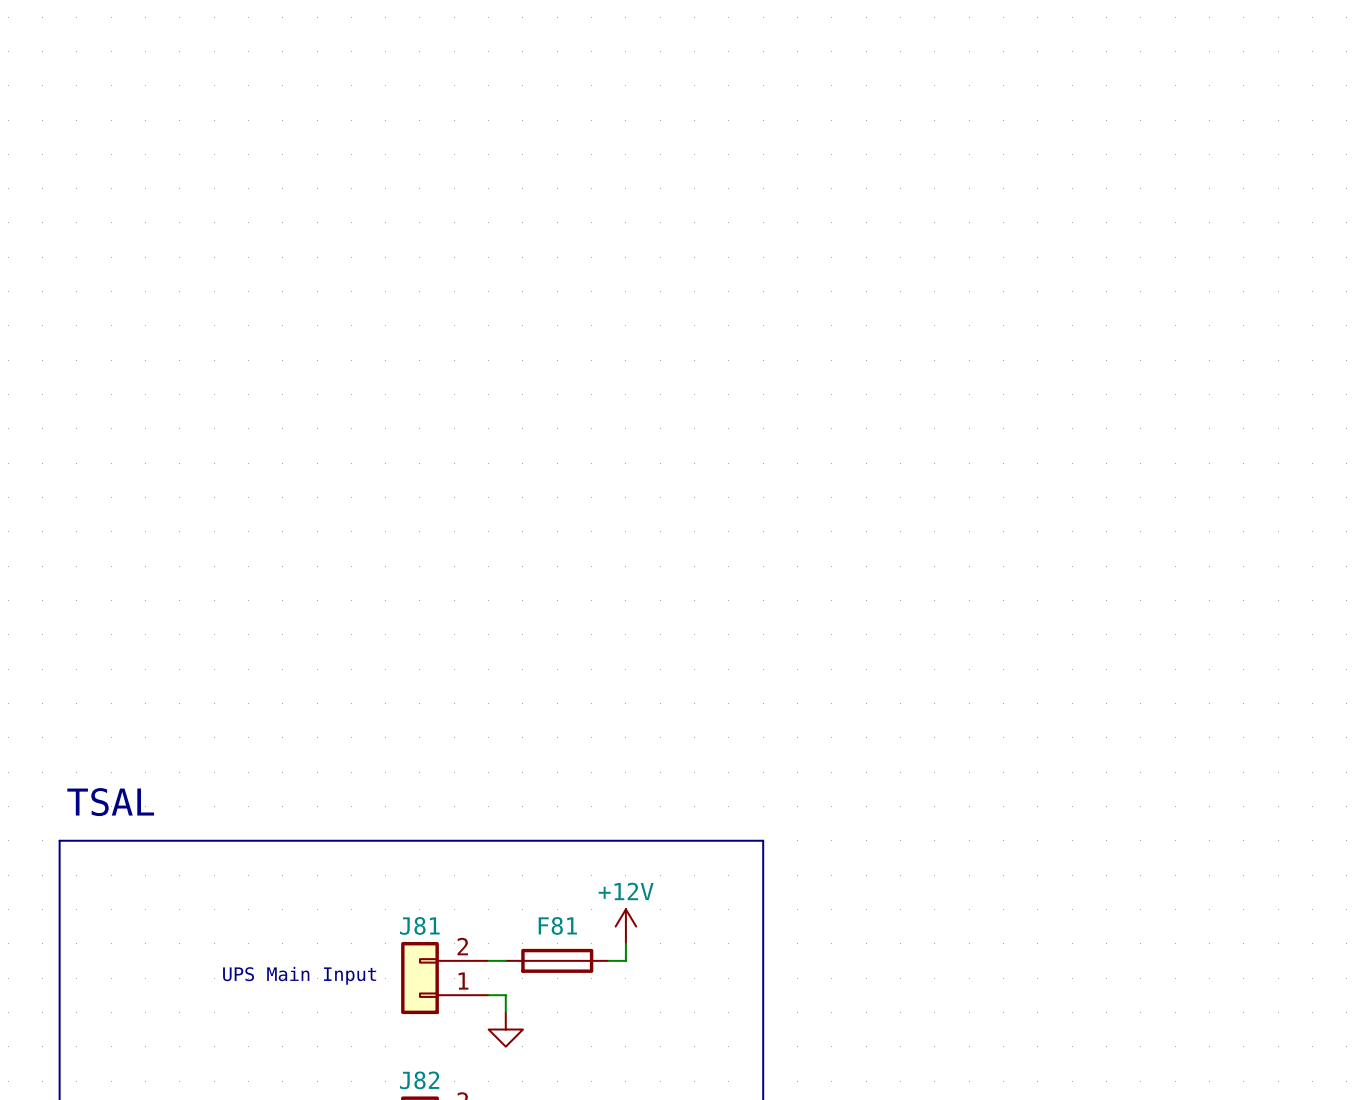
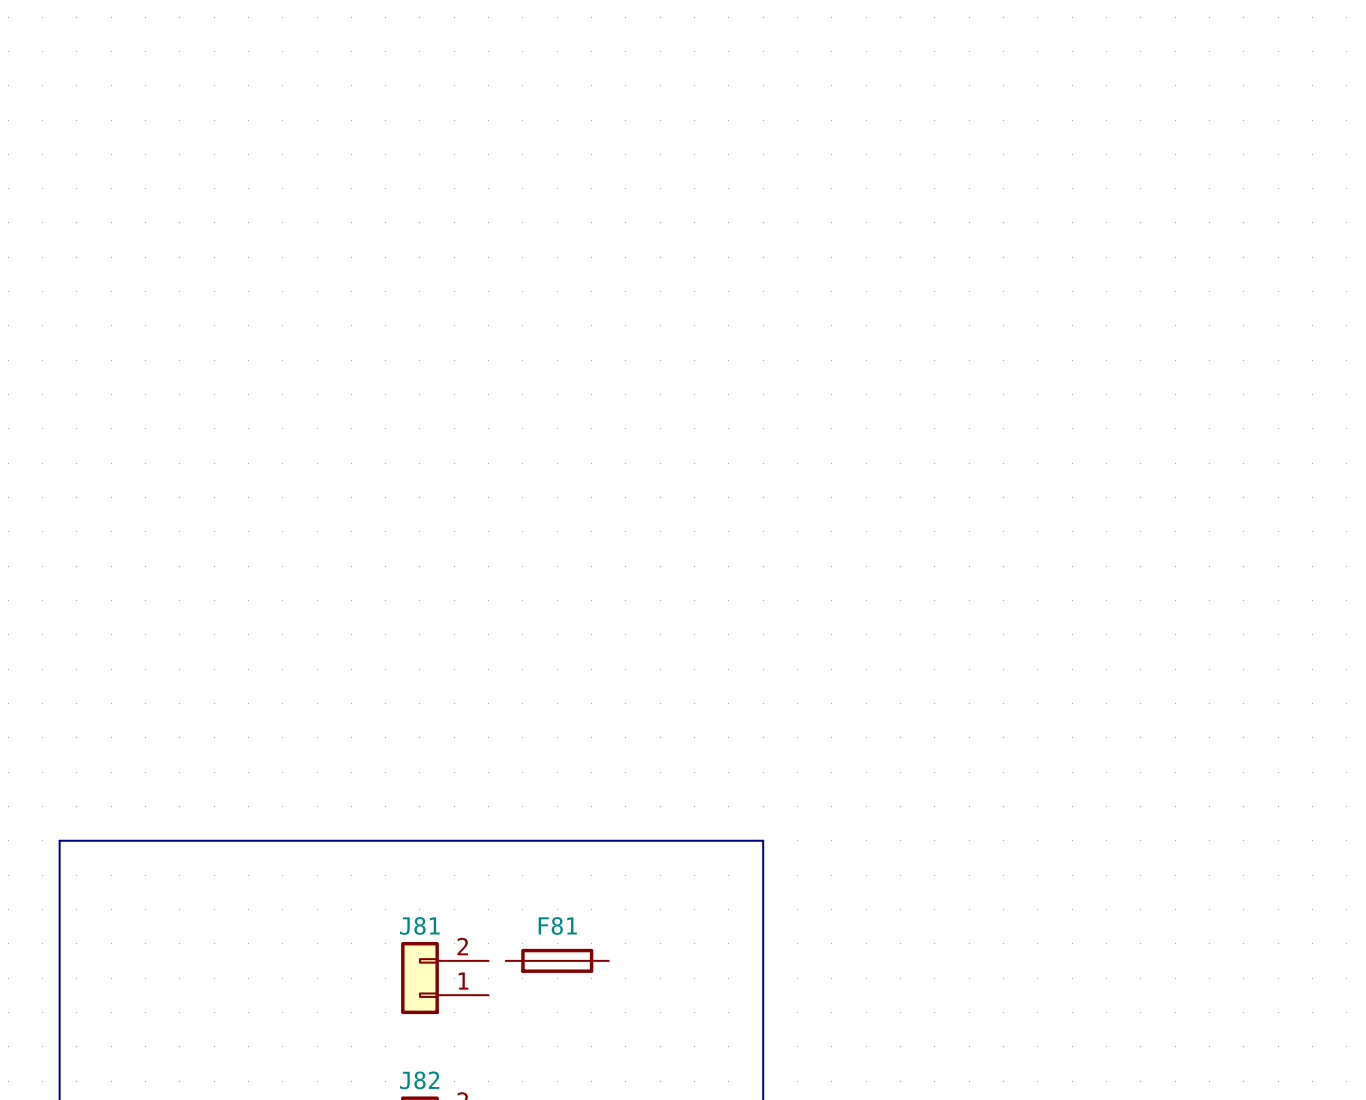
text: TSAL (110, 802) -> none
power symbol: +12V (625, 926) -> none
wire: (625, 943) (625, 960) (608, 960) -> none
wire: (488, 960) (505, 960) -> none
text: UPS Main Input (299, 975) -> none
wire: (488, 995) (505, 995) (505, 1012) -> none
power symbol: (505, 1029) -> none

